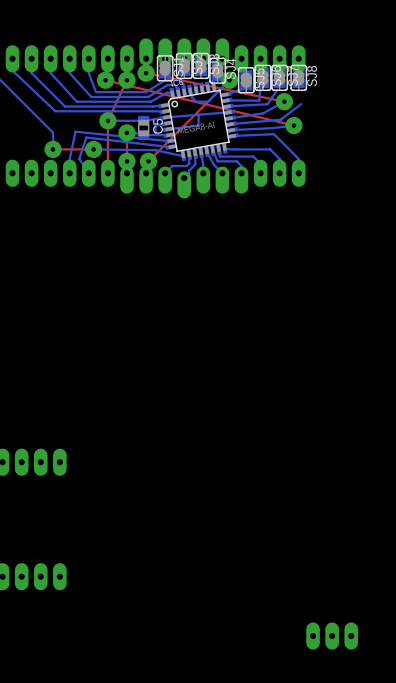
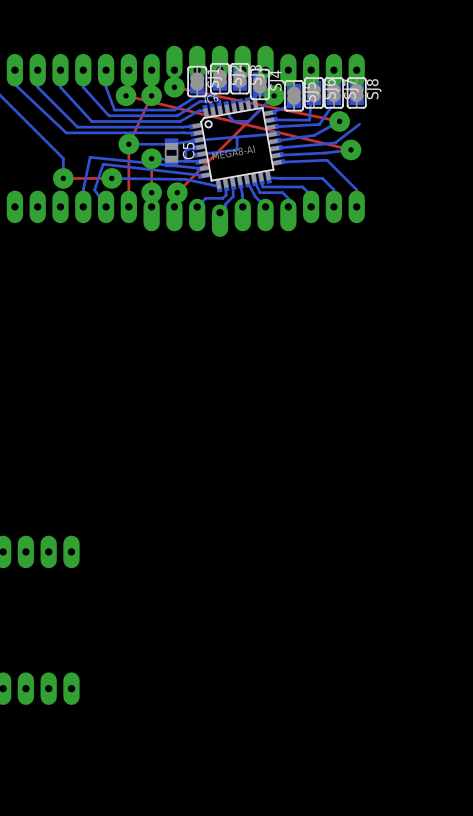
part: (332, 636) -> none

